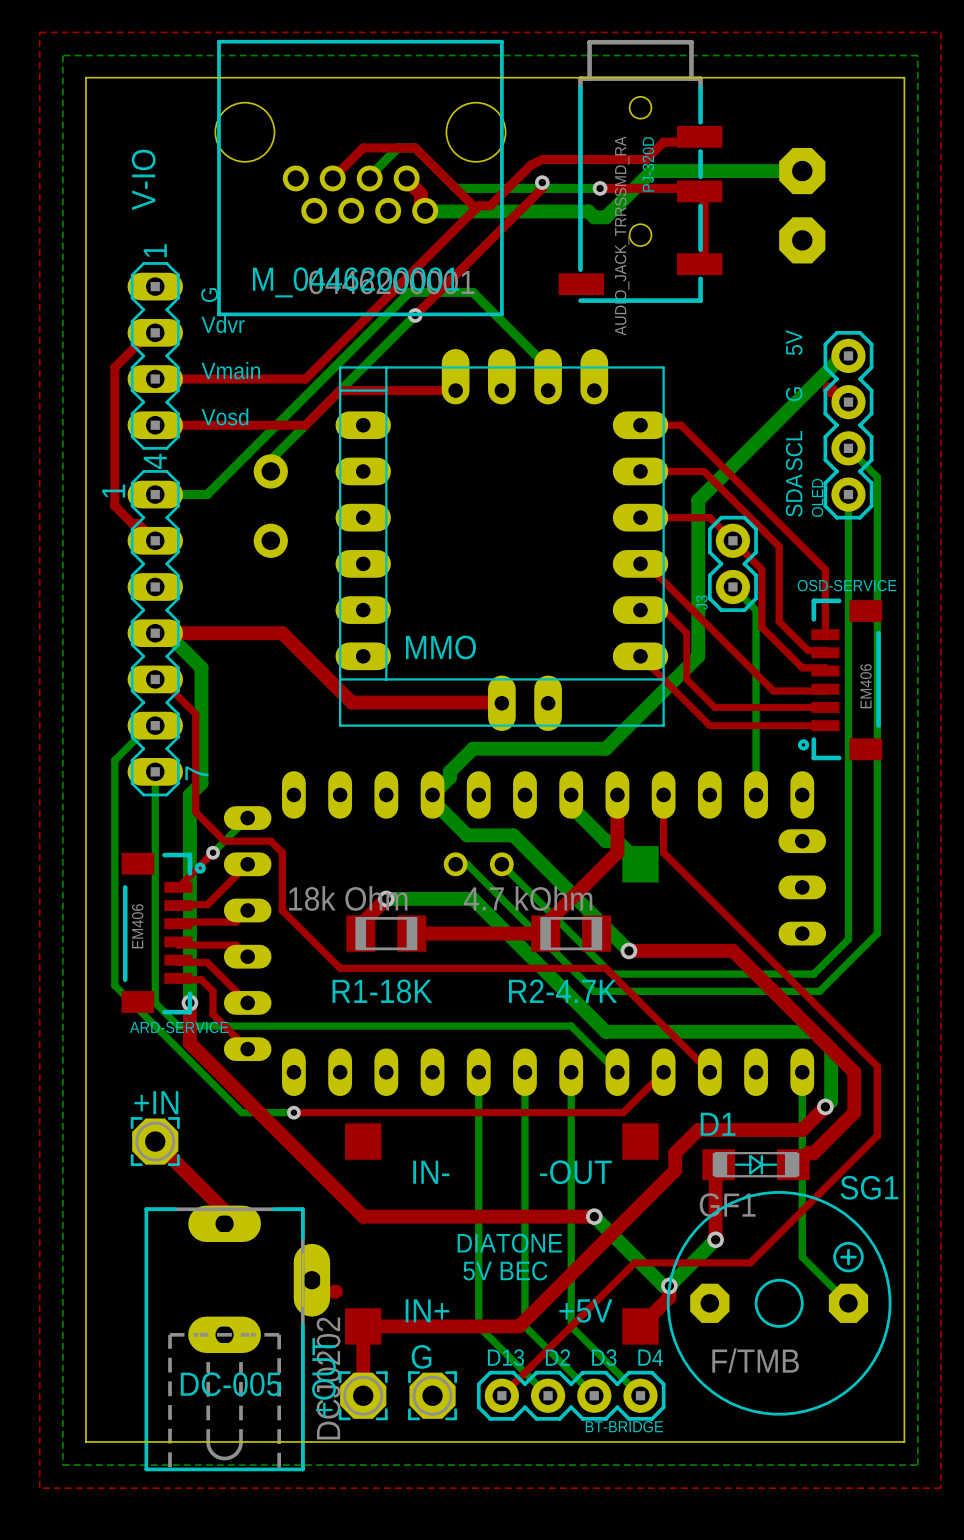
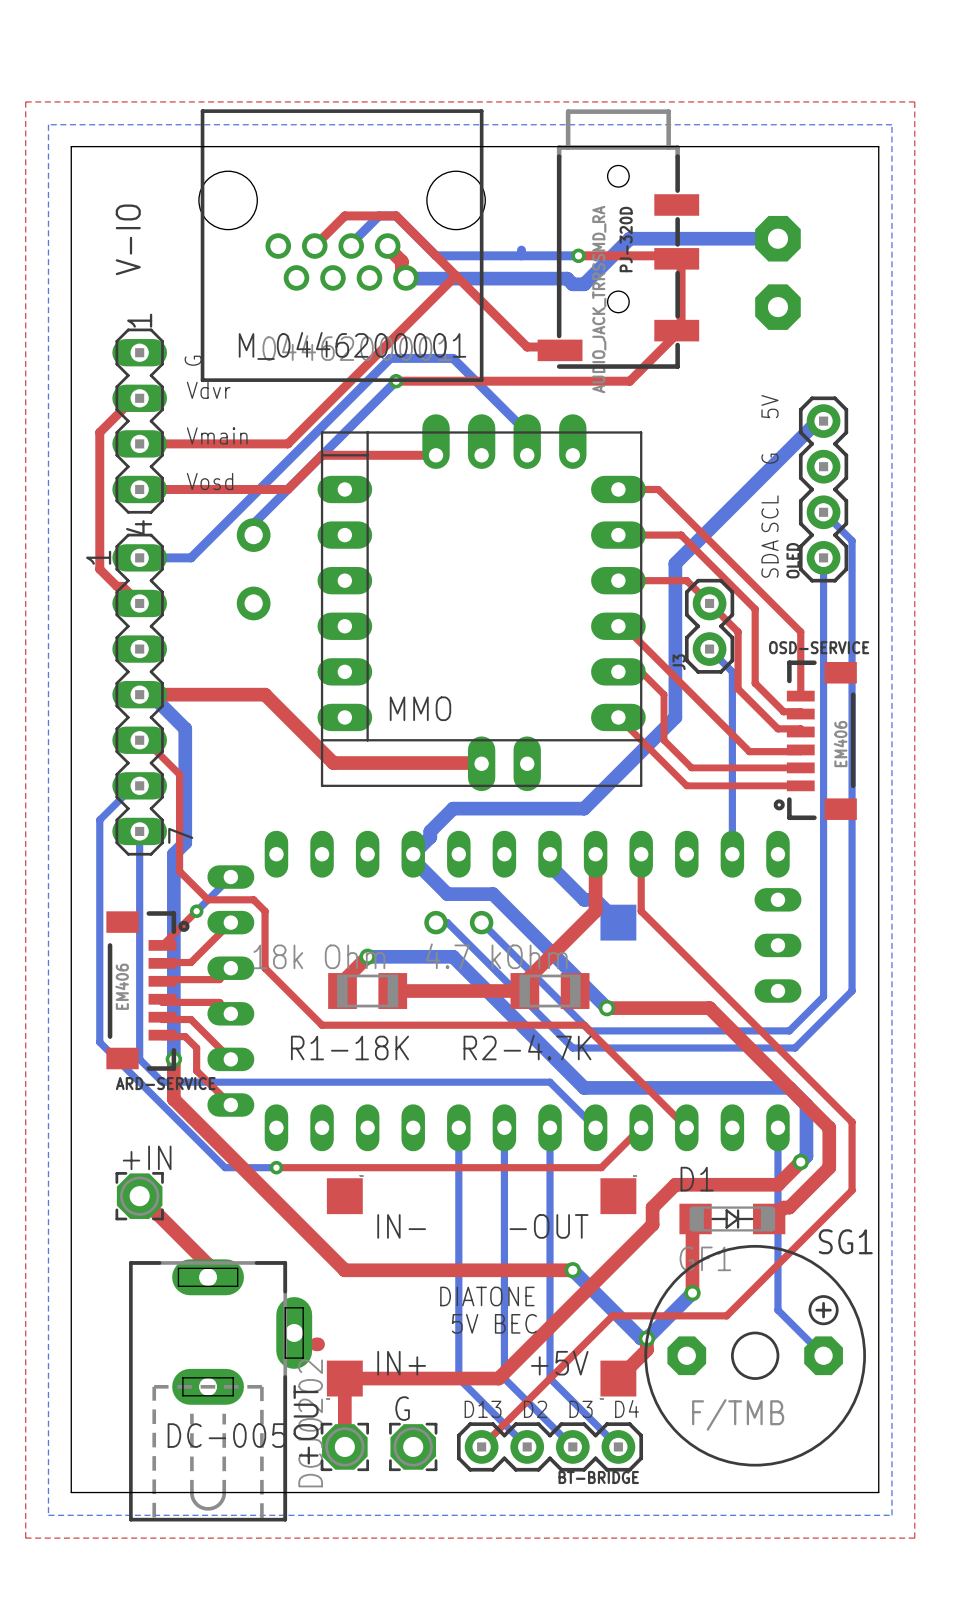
top track: (699, 136) (698, 142) (663, 142) (646, 159) (542, 159) (530, 165) (490, 205) (478, 205) (475, 208) -> (560, 350) (555, 347) (527, 347) (455, 275)
top track: (542, 182) (542, 188) (415, 315) -> (675, 335) (629, 381) (396, 381)
via: (542, 182) -> none
top track: (829, 389) (831, 390) -> none

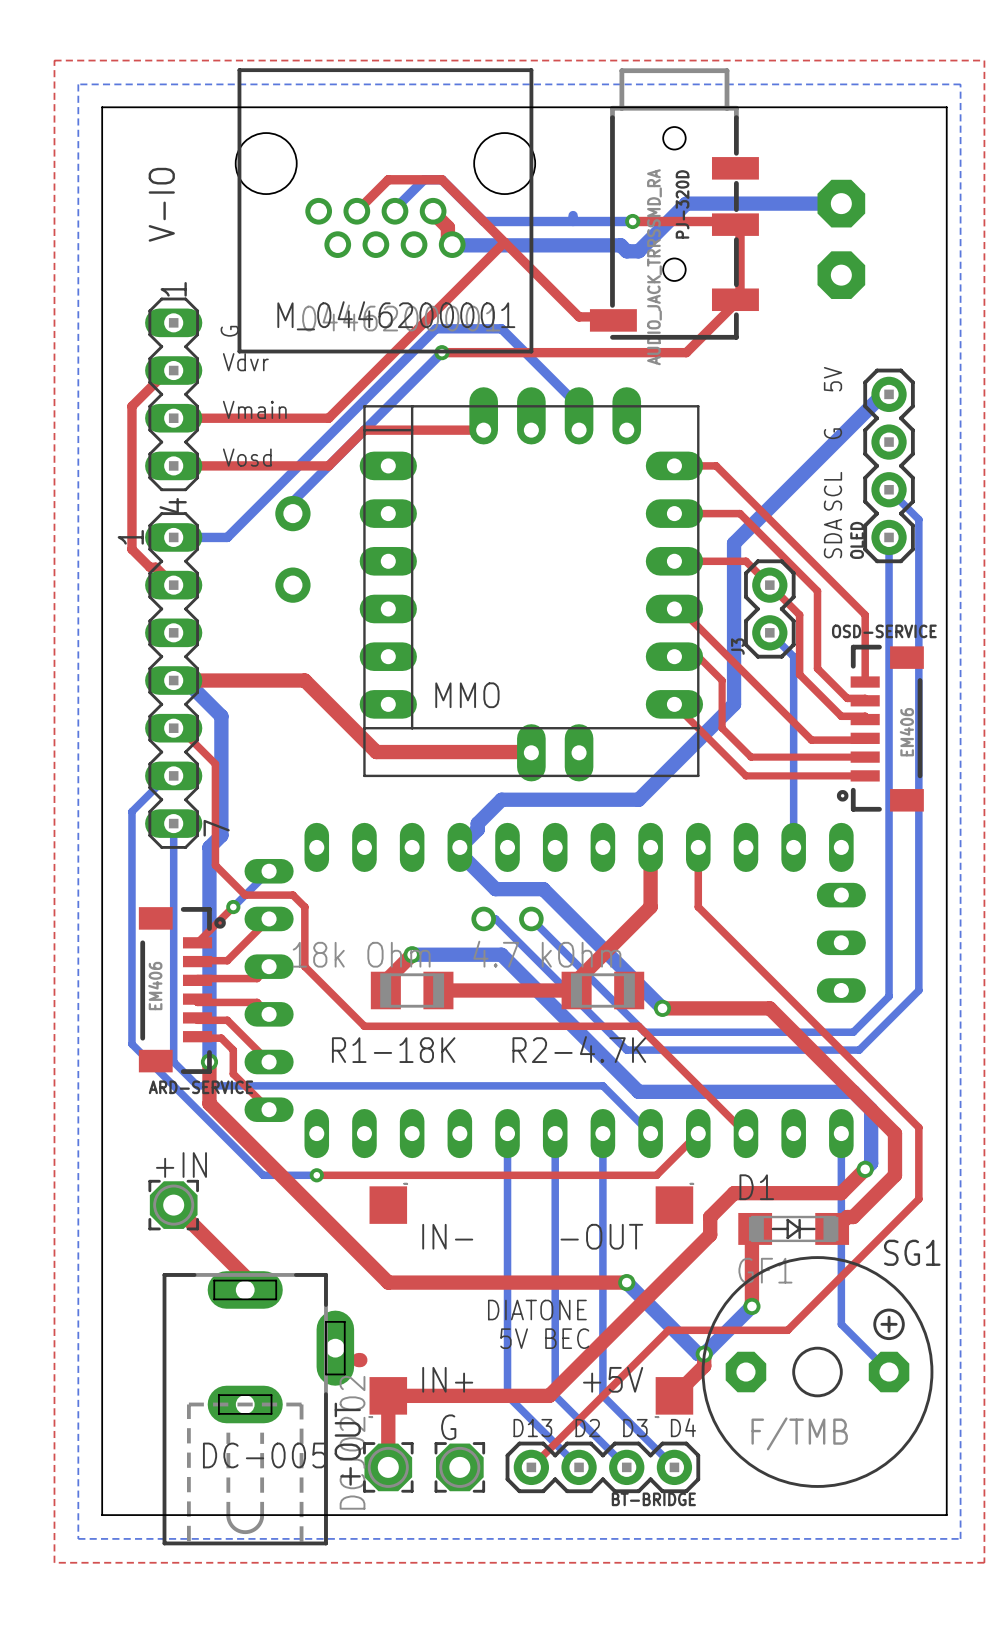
bottom track: (550, 854) (550, 865) (584, 899) (595, 899) (618, 922) -> none
part: (618, 922) -> none

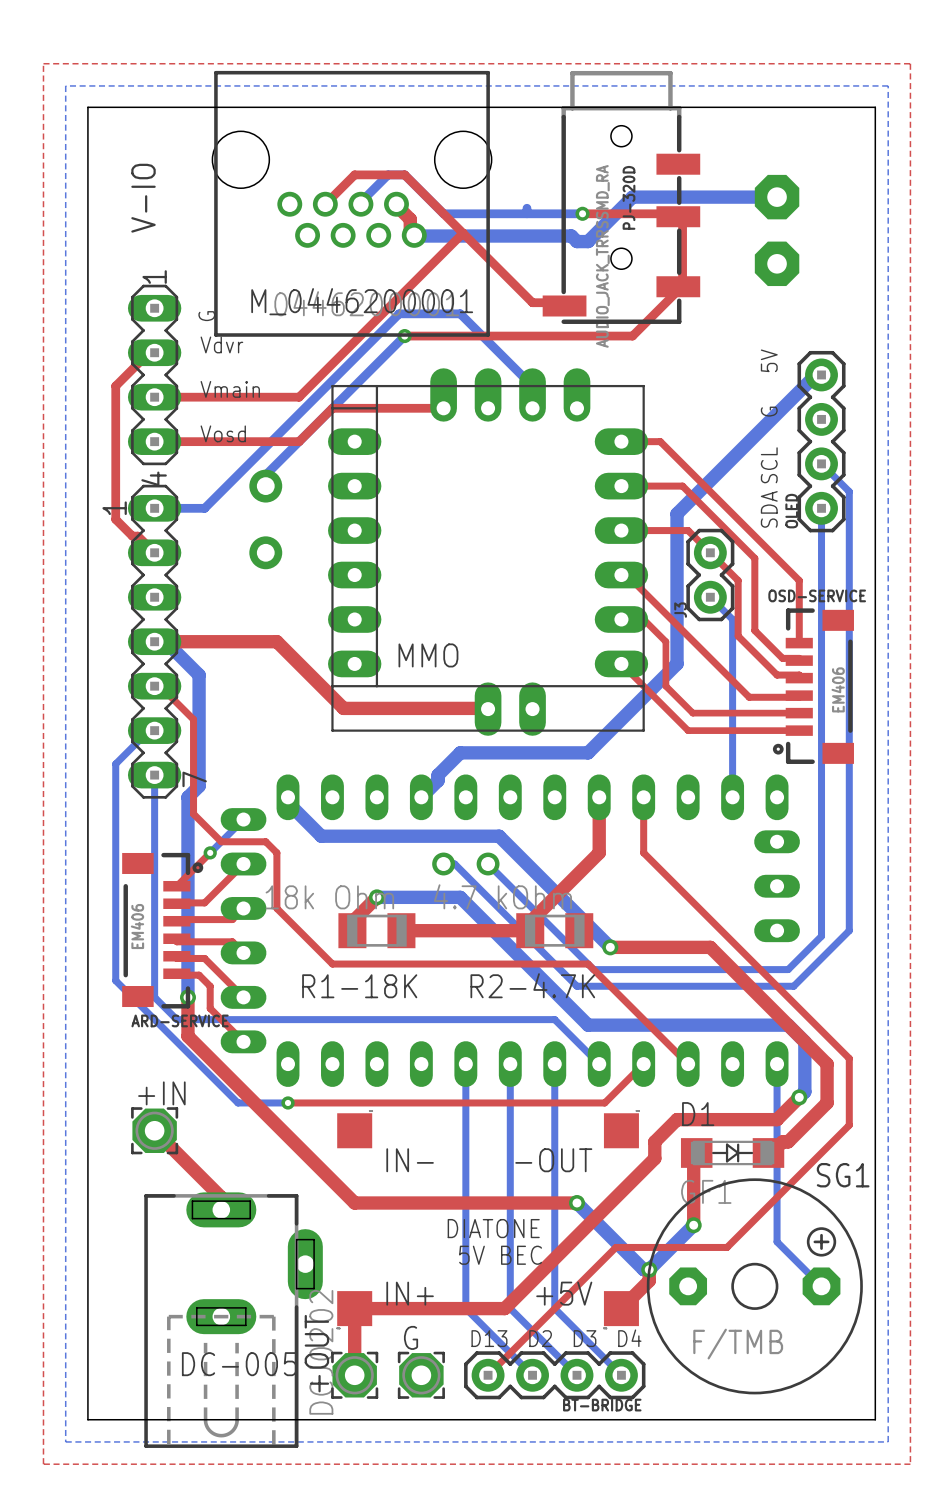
bottom track: (459, 847) (459, 859) (465, 859) (495, 889) -> (288, 797) (288, 802) (321, 836) (454, 836)
top track: (358, 1360) (360, 1360) -> none

